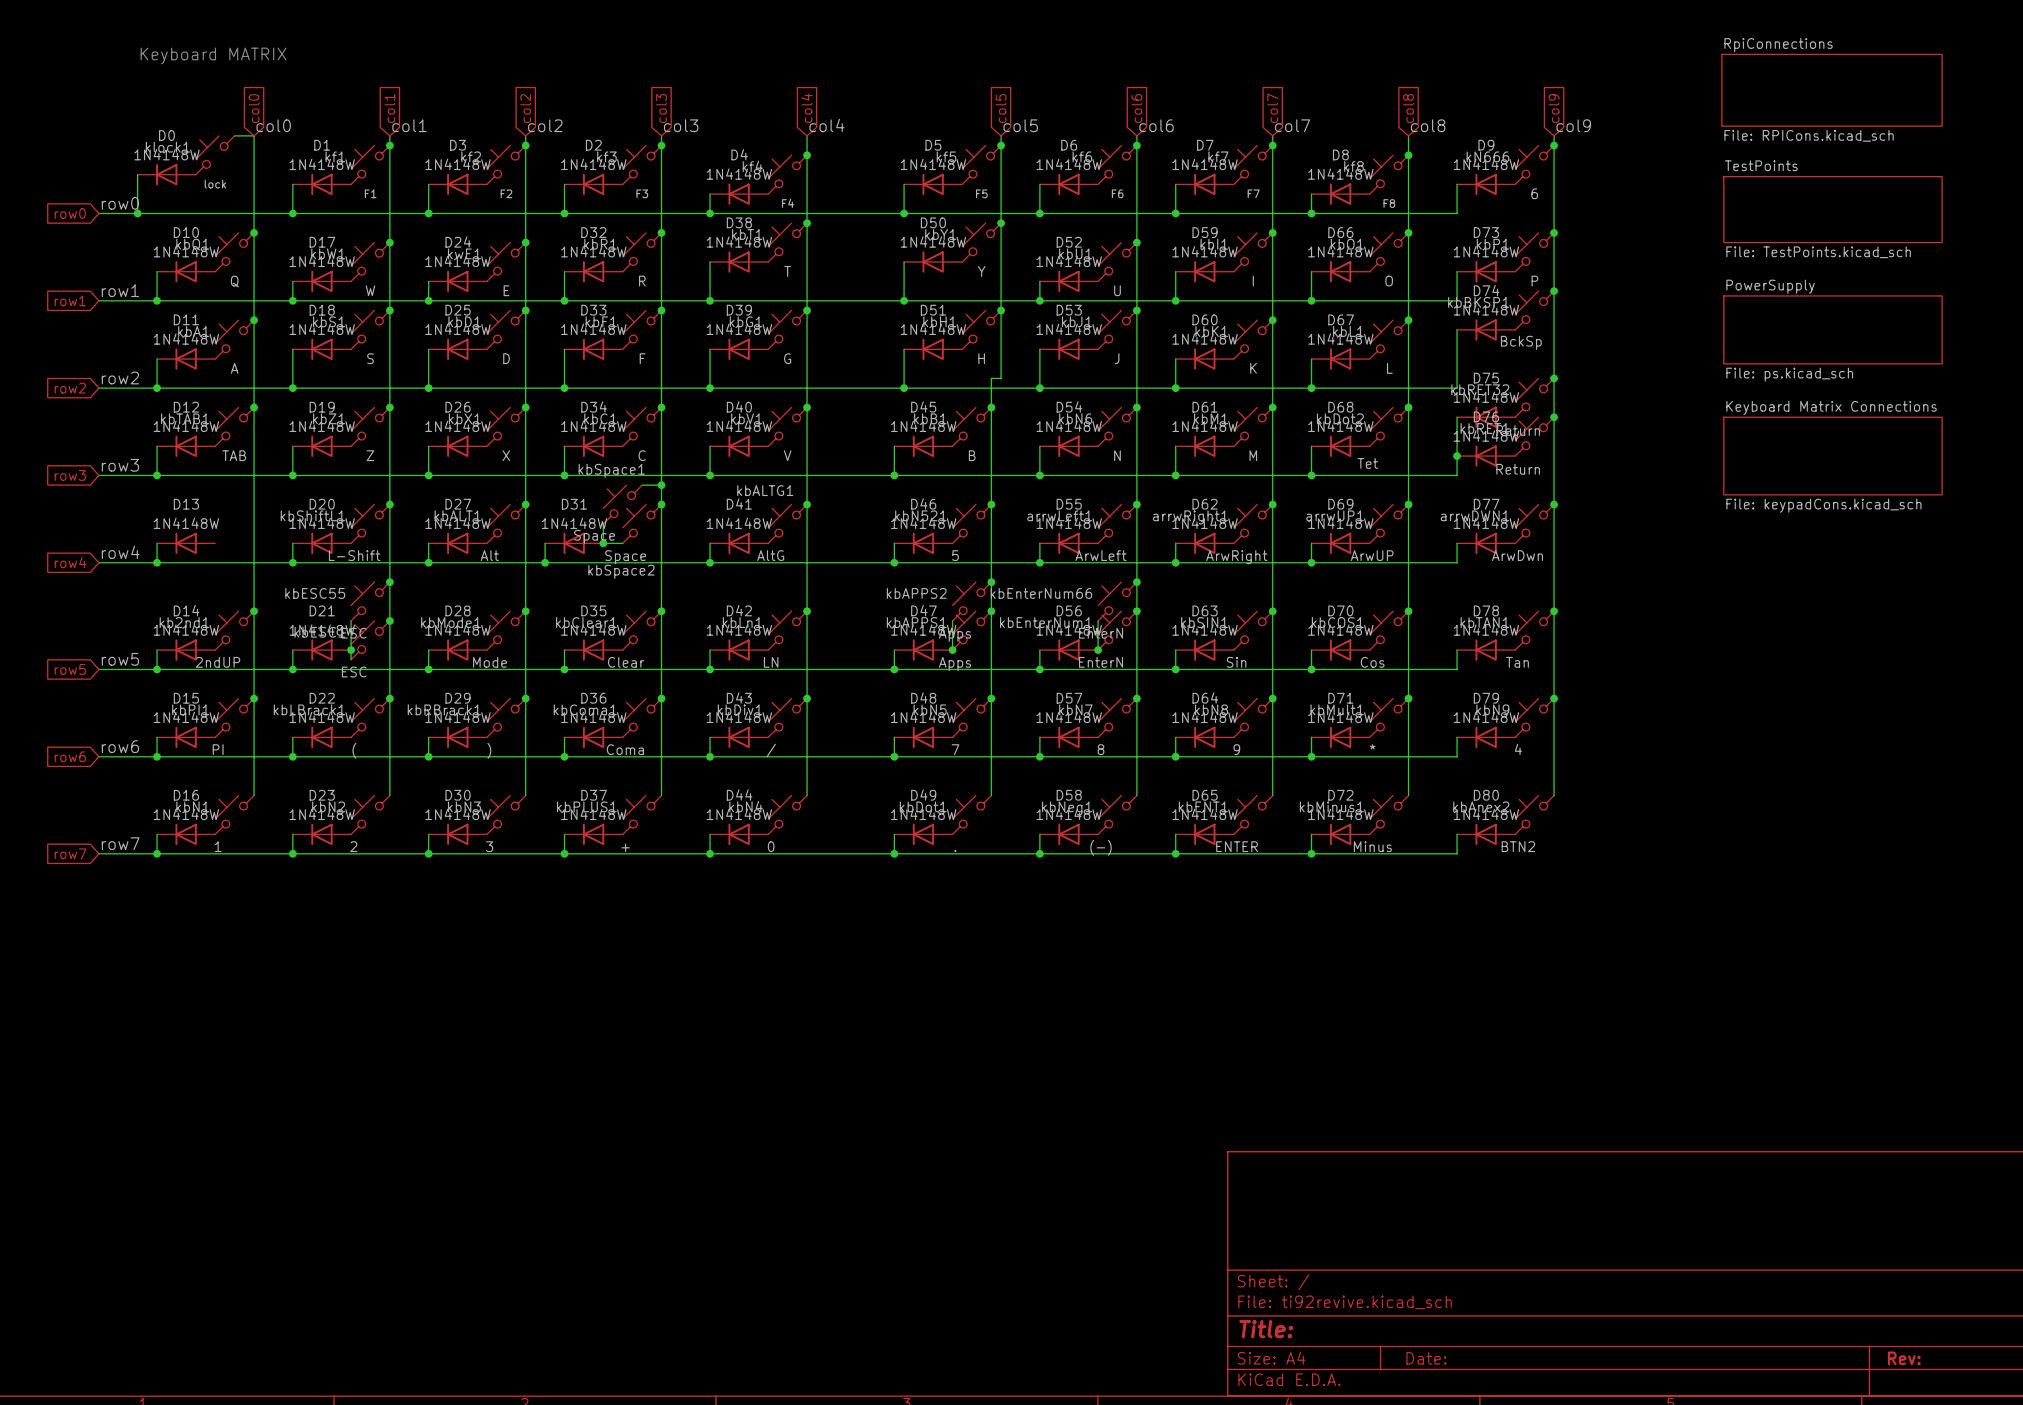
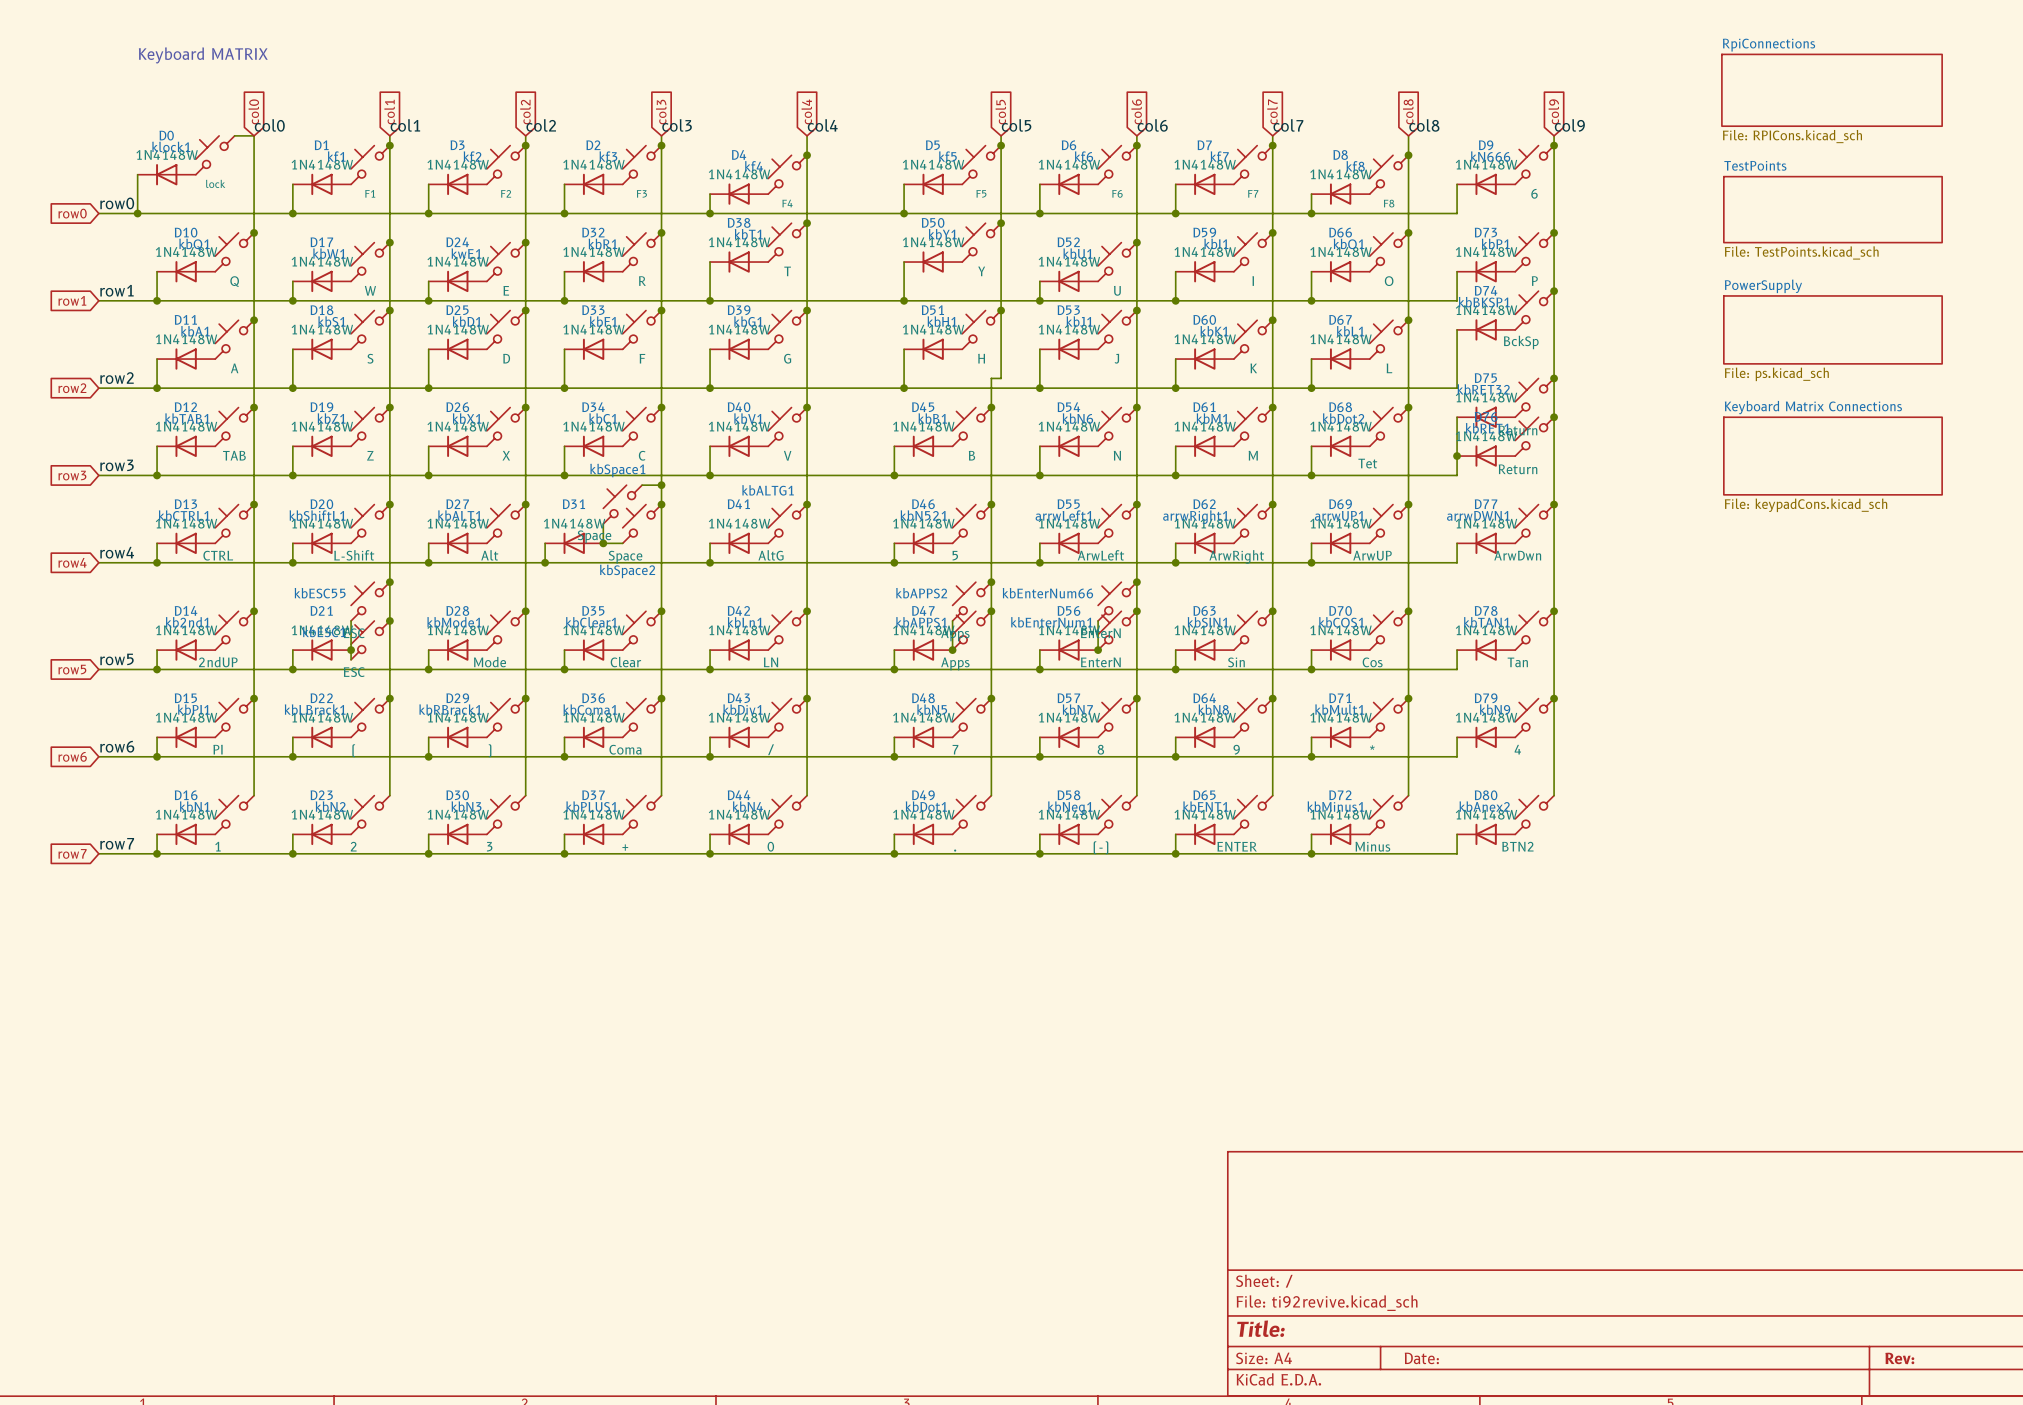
junction: none -> (254, 504)
kbCTRL1: none -> CTRL (234, 523)

